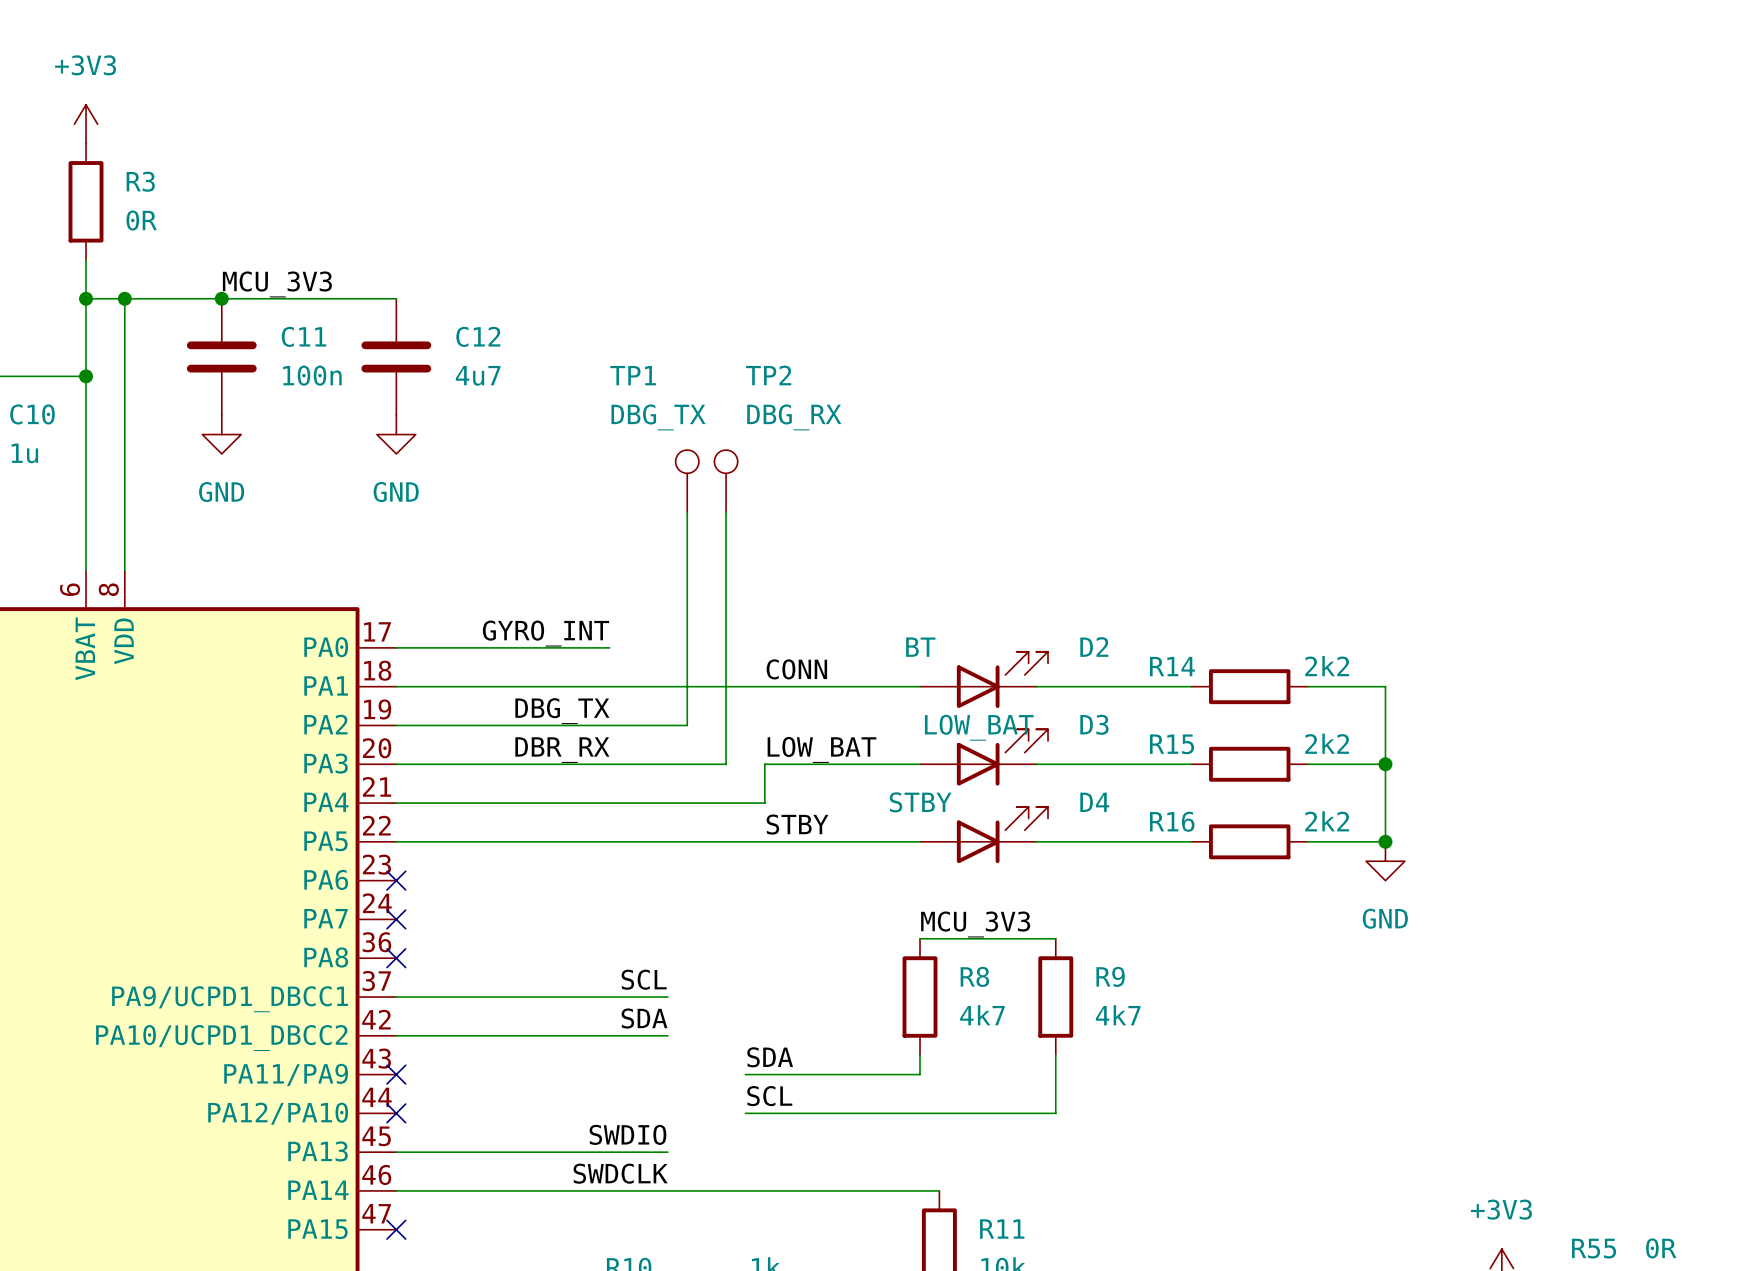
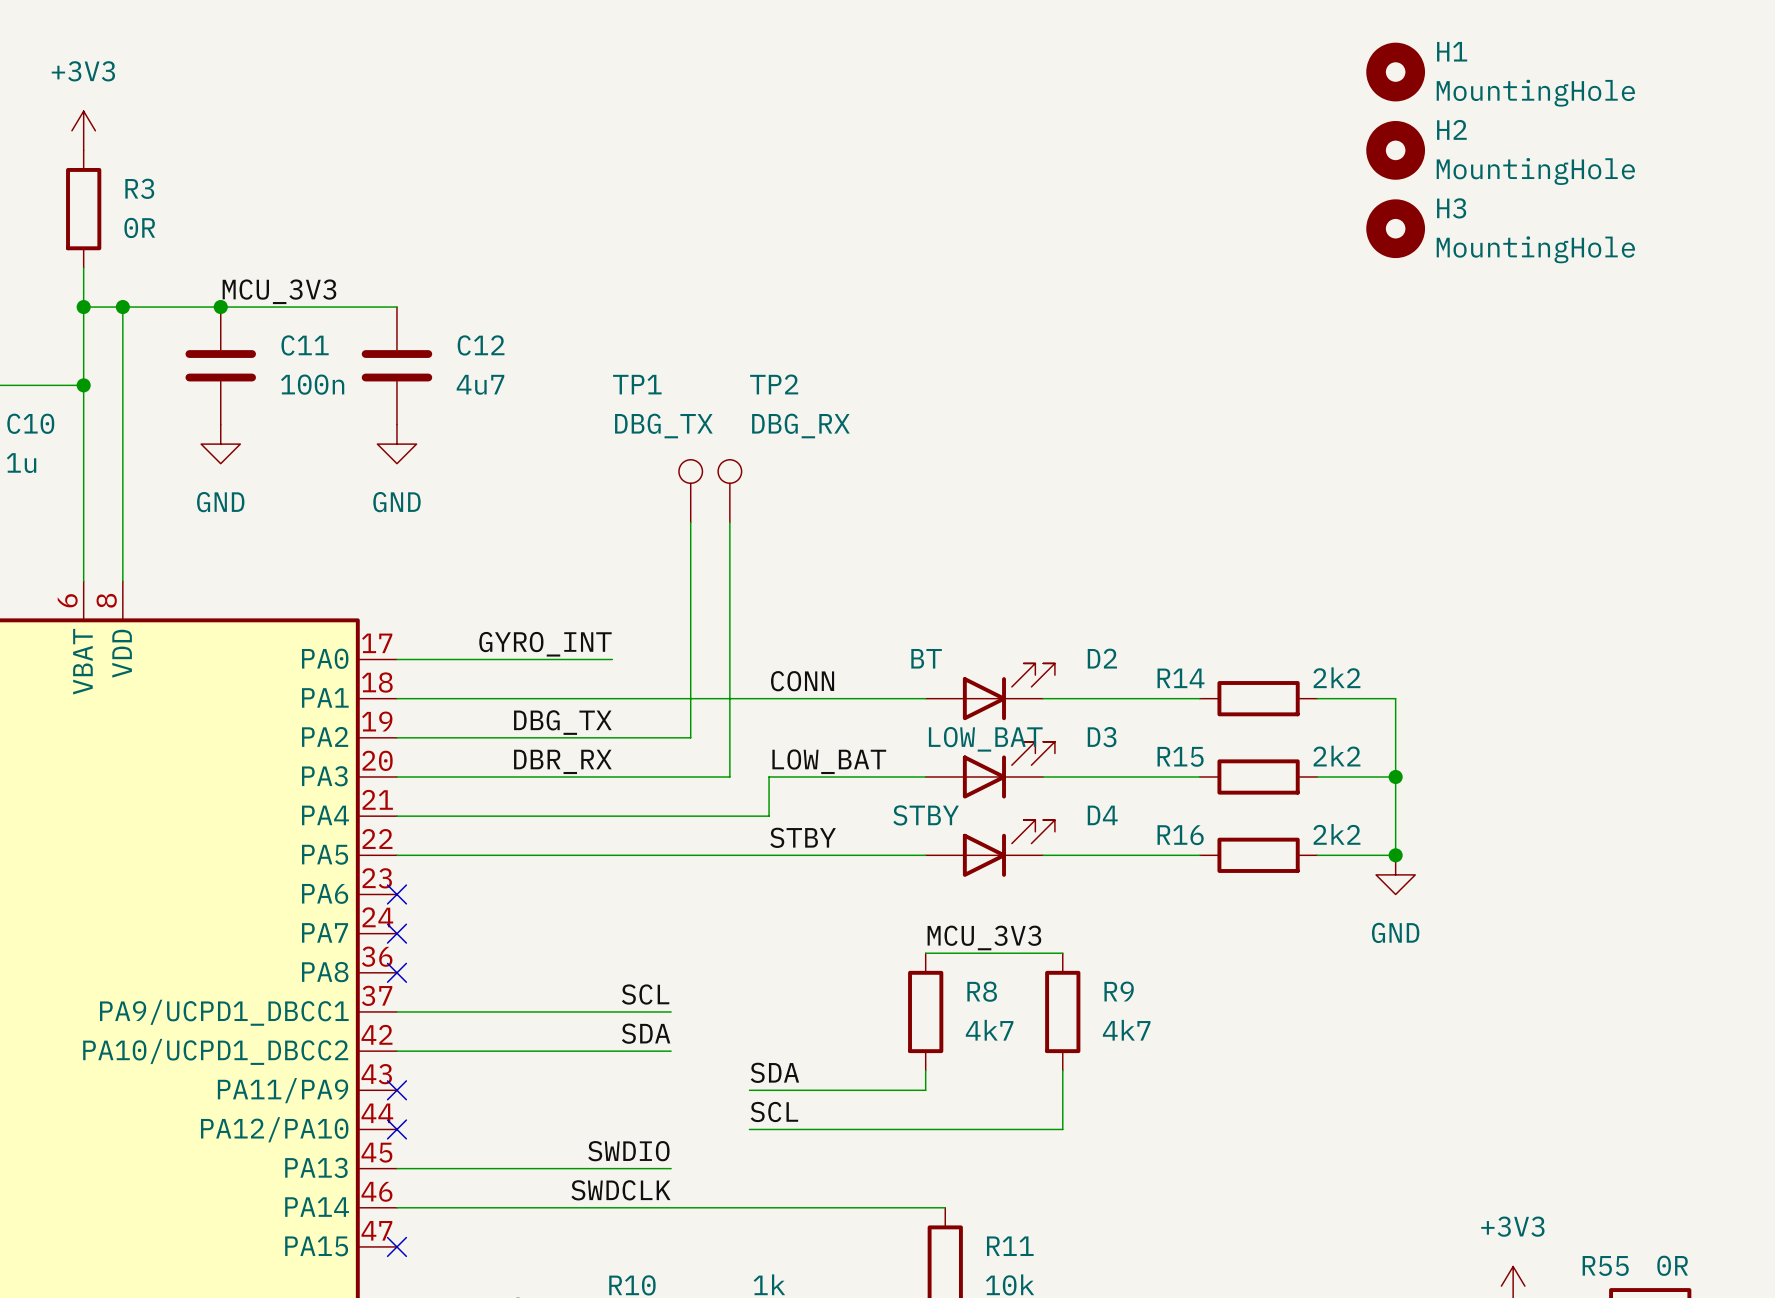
H1: none -> MountingHole (1395, 72)
H2: none -> MountingHole (1395, 150)
H3: none -> MountingHole (1395, 228)

